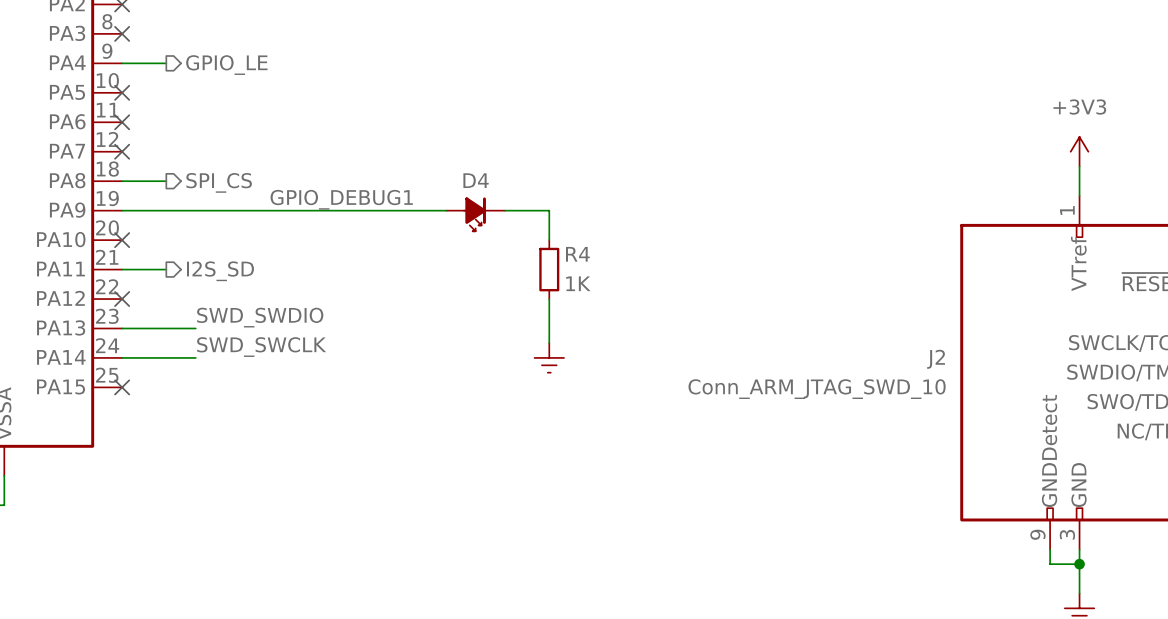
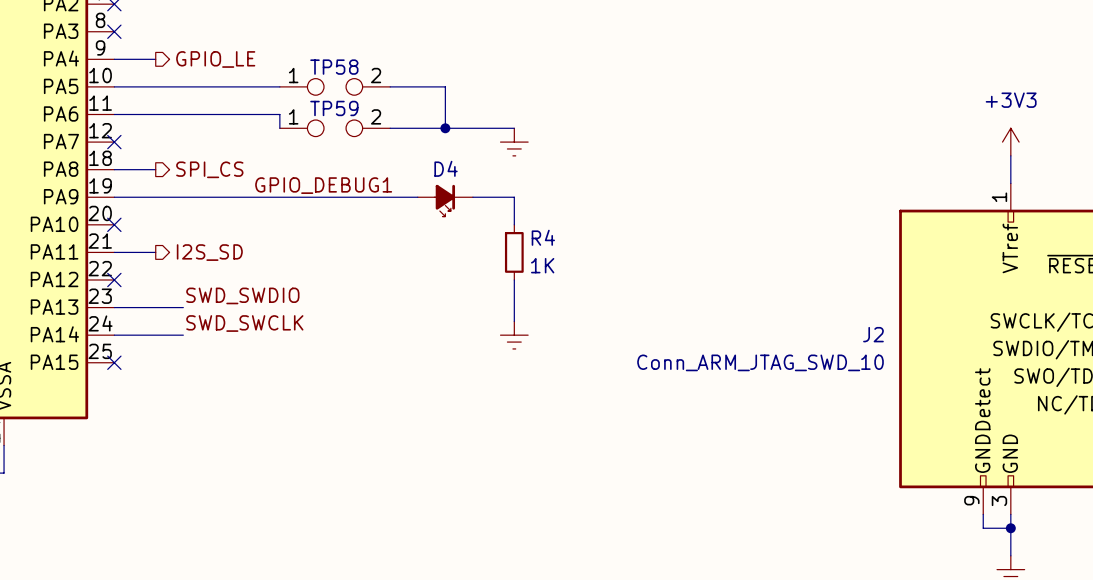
wire: none -> (114, 86) (279, 86)
no-connect mark: (122, 92) -> none
TP58: none -> (335, 86)
wire: none -> (390, 86) (445, 86) (445, 128)
wire: none -> (114, 114) (279, 114) (279, 128)
no-connect mark: (122, 122) -> none
TP59: none -> (335, 128)
wire: none -> (390, 128) (514, 128)
junction: none -> (445, 128)
power symbol: none -> (514, 142)

